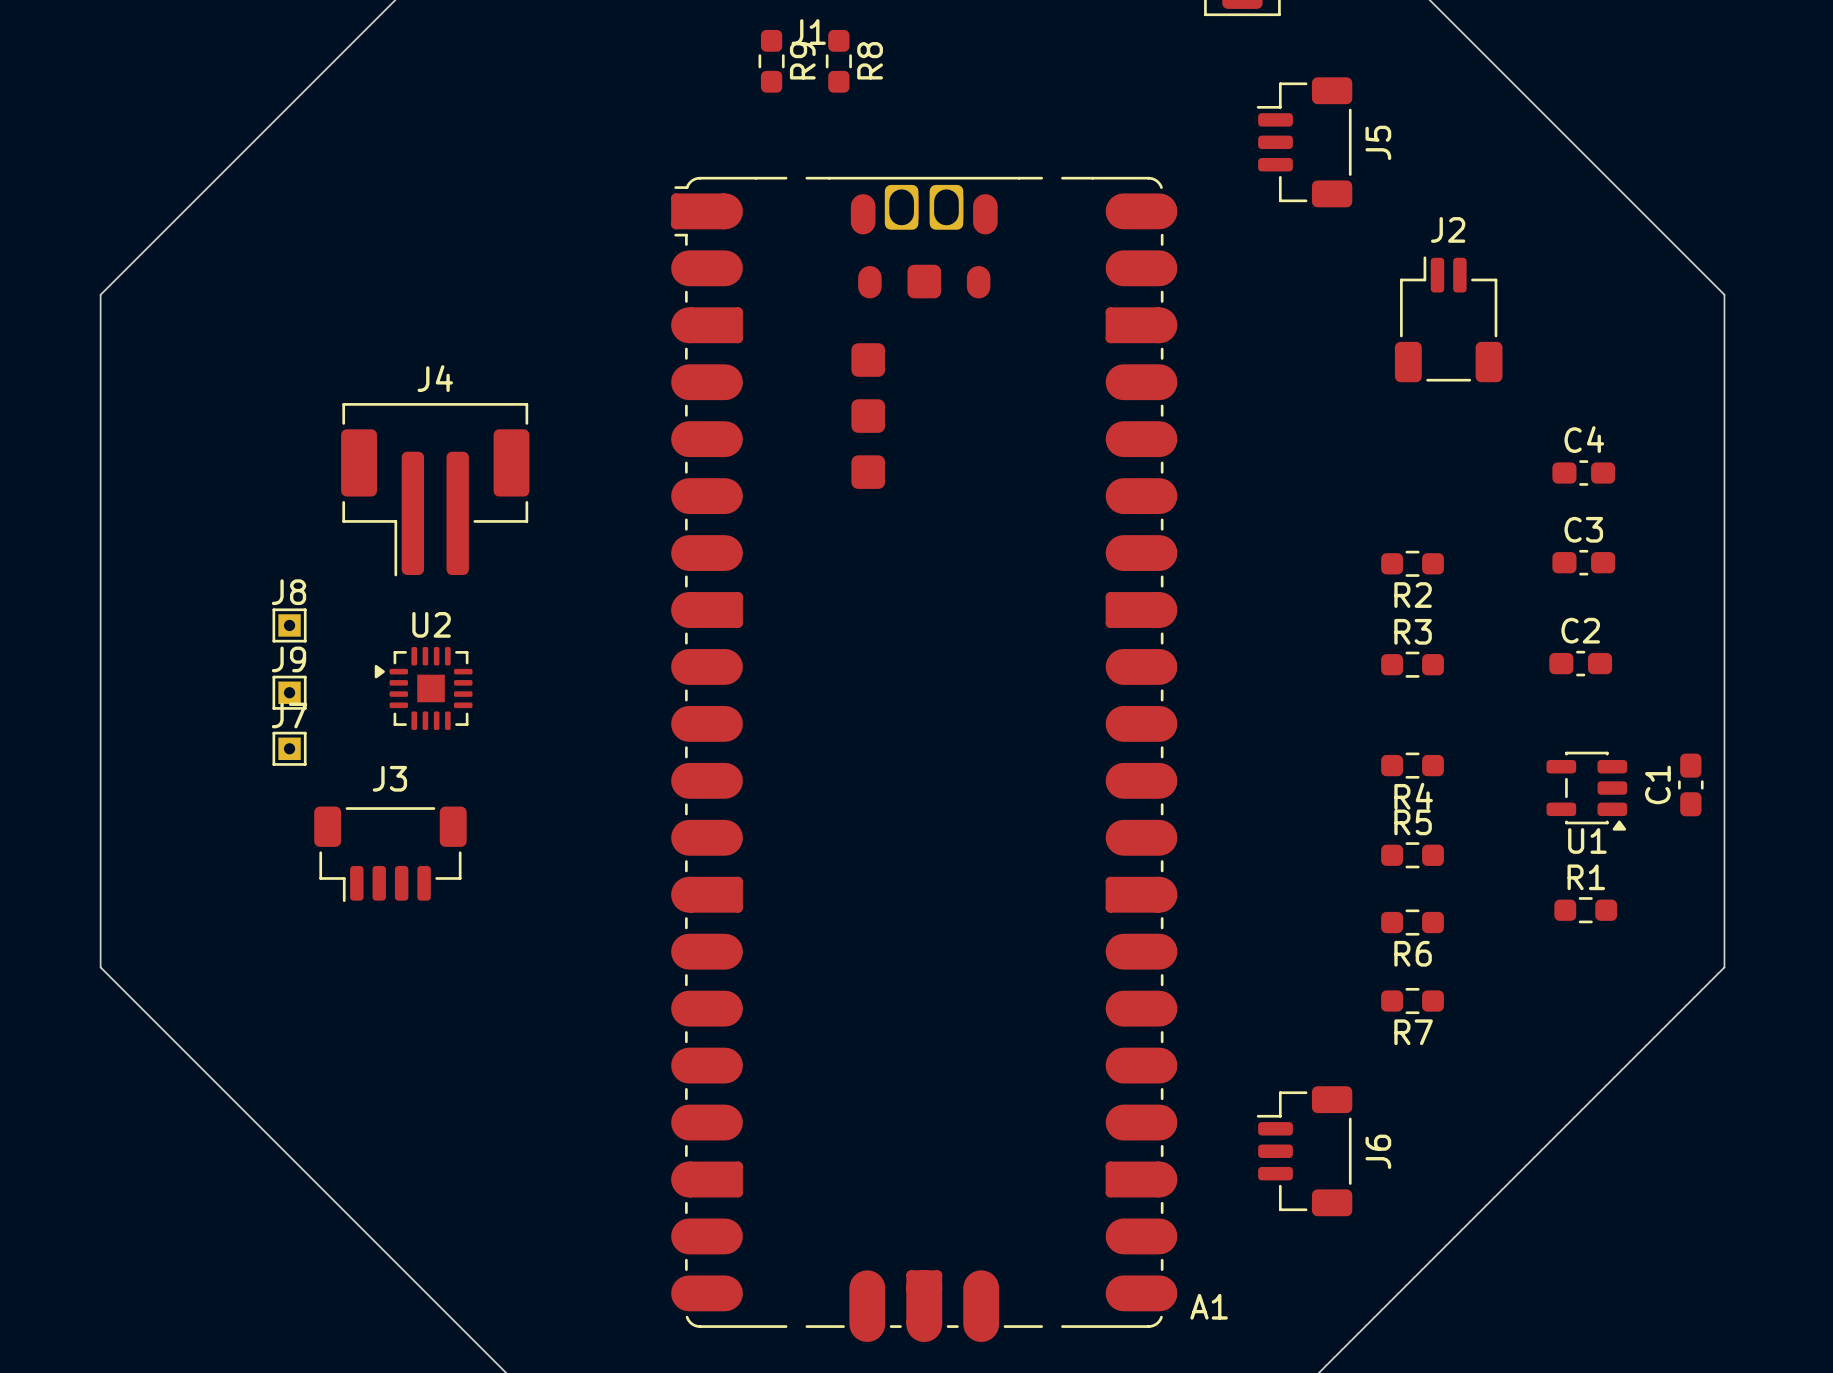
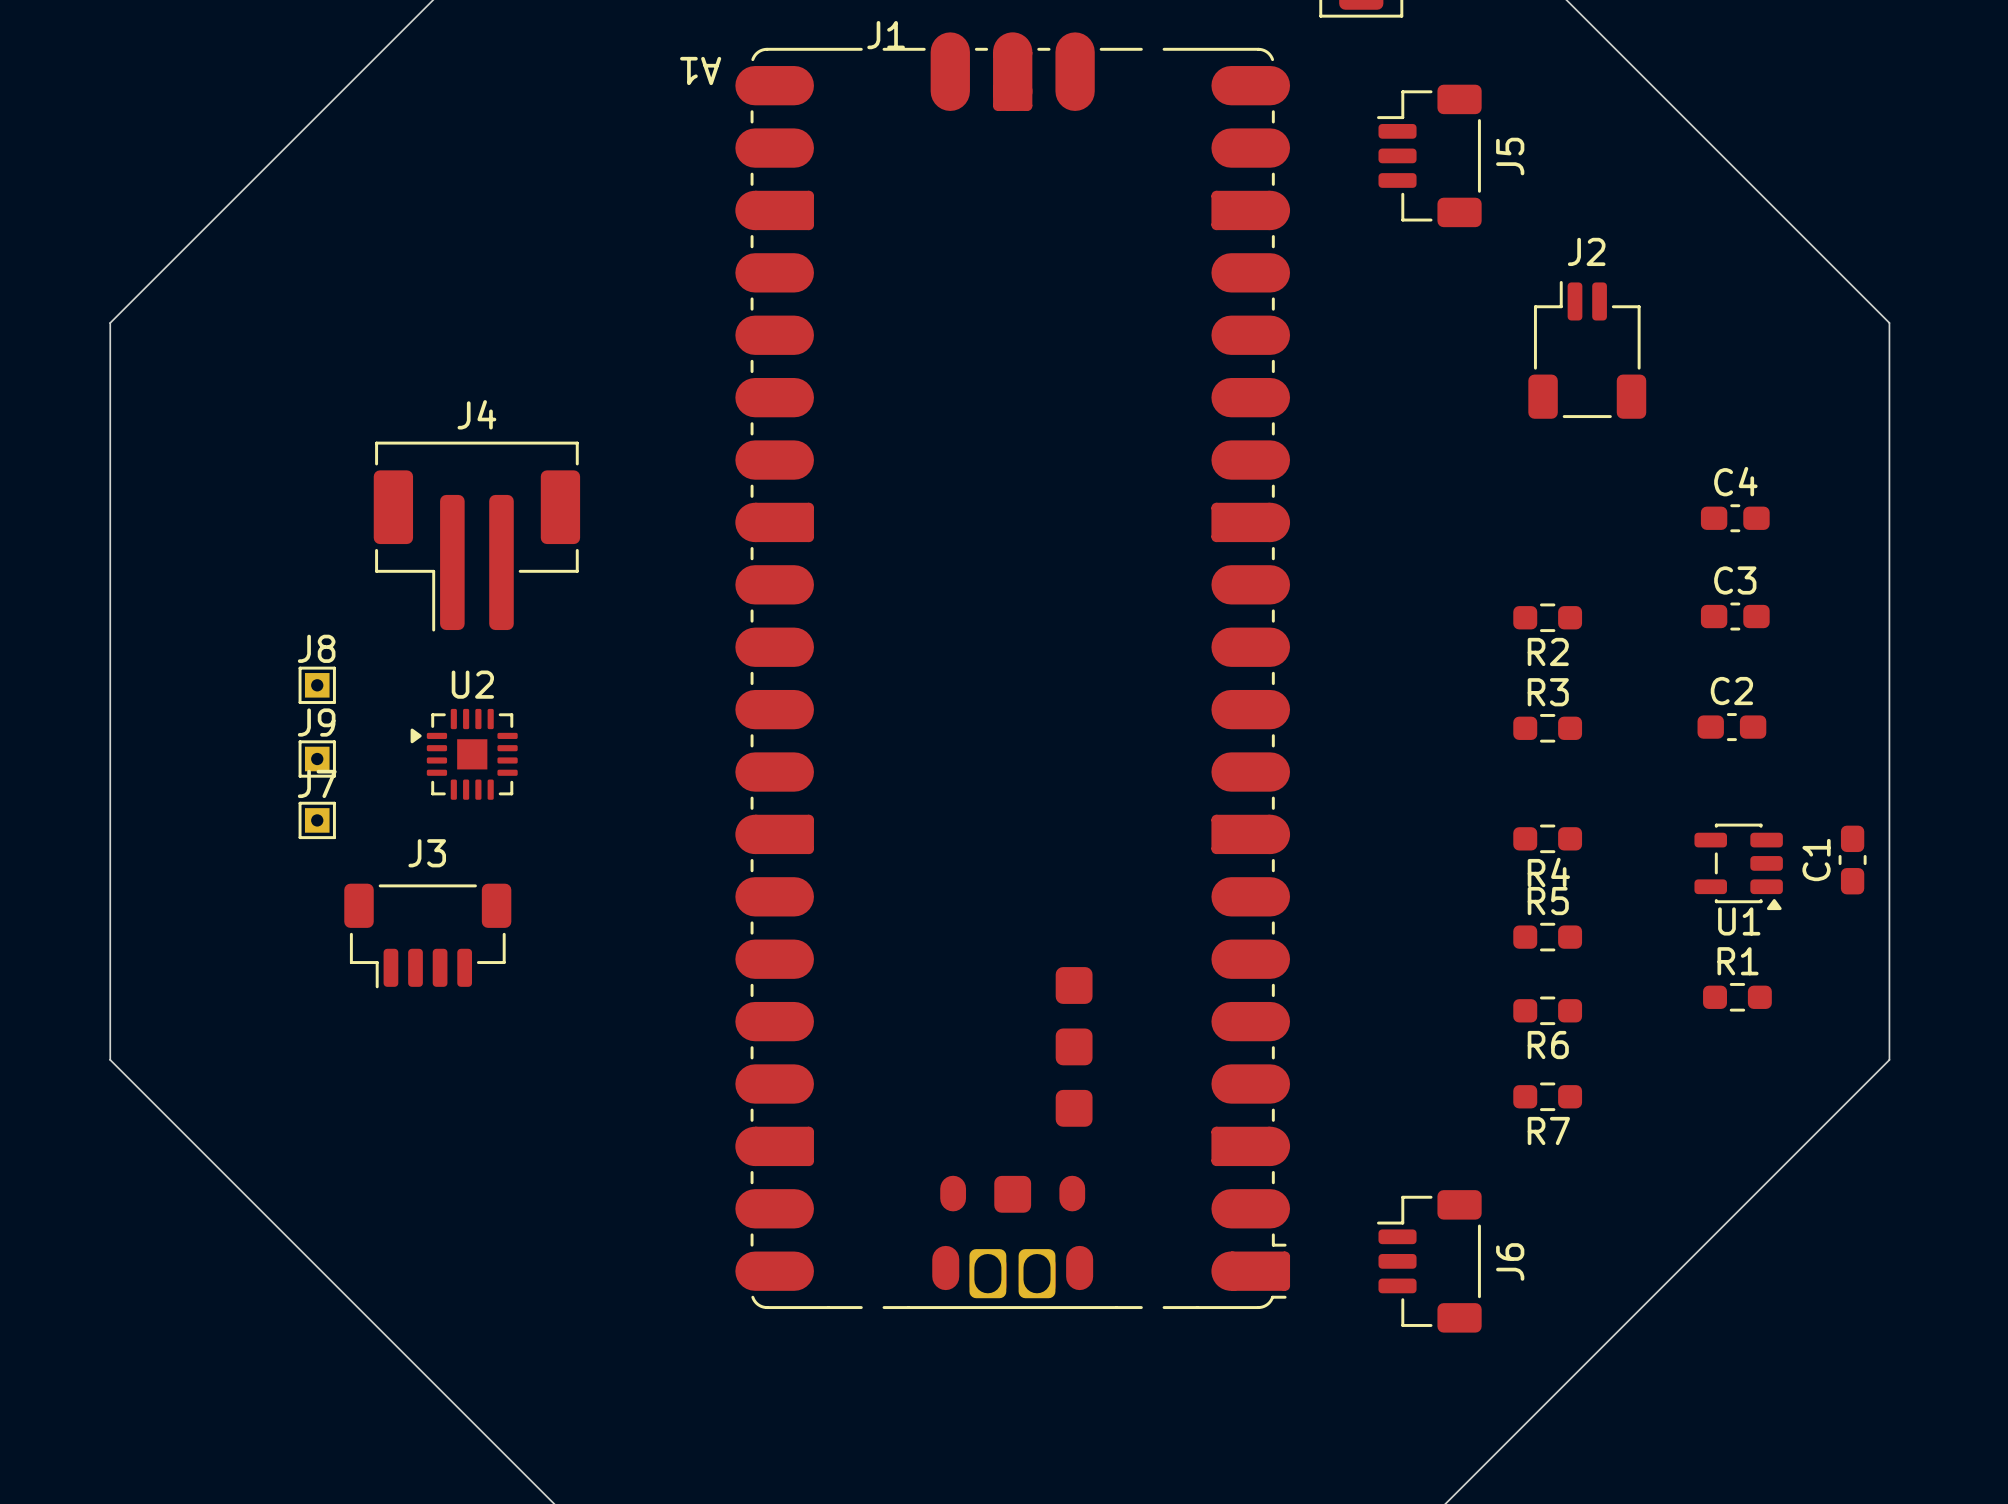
R9: (771, 61) -> none
R8: (838, 61) -> none
part: (901, 207) -> none
part: (946, 207) -> none
A1 rotation: 0° (924, 759) -> 180° (1012, 670)
part: none -> (987, 1273)
part: none -> (1037, 1273)

